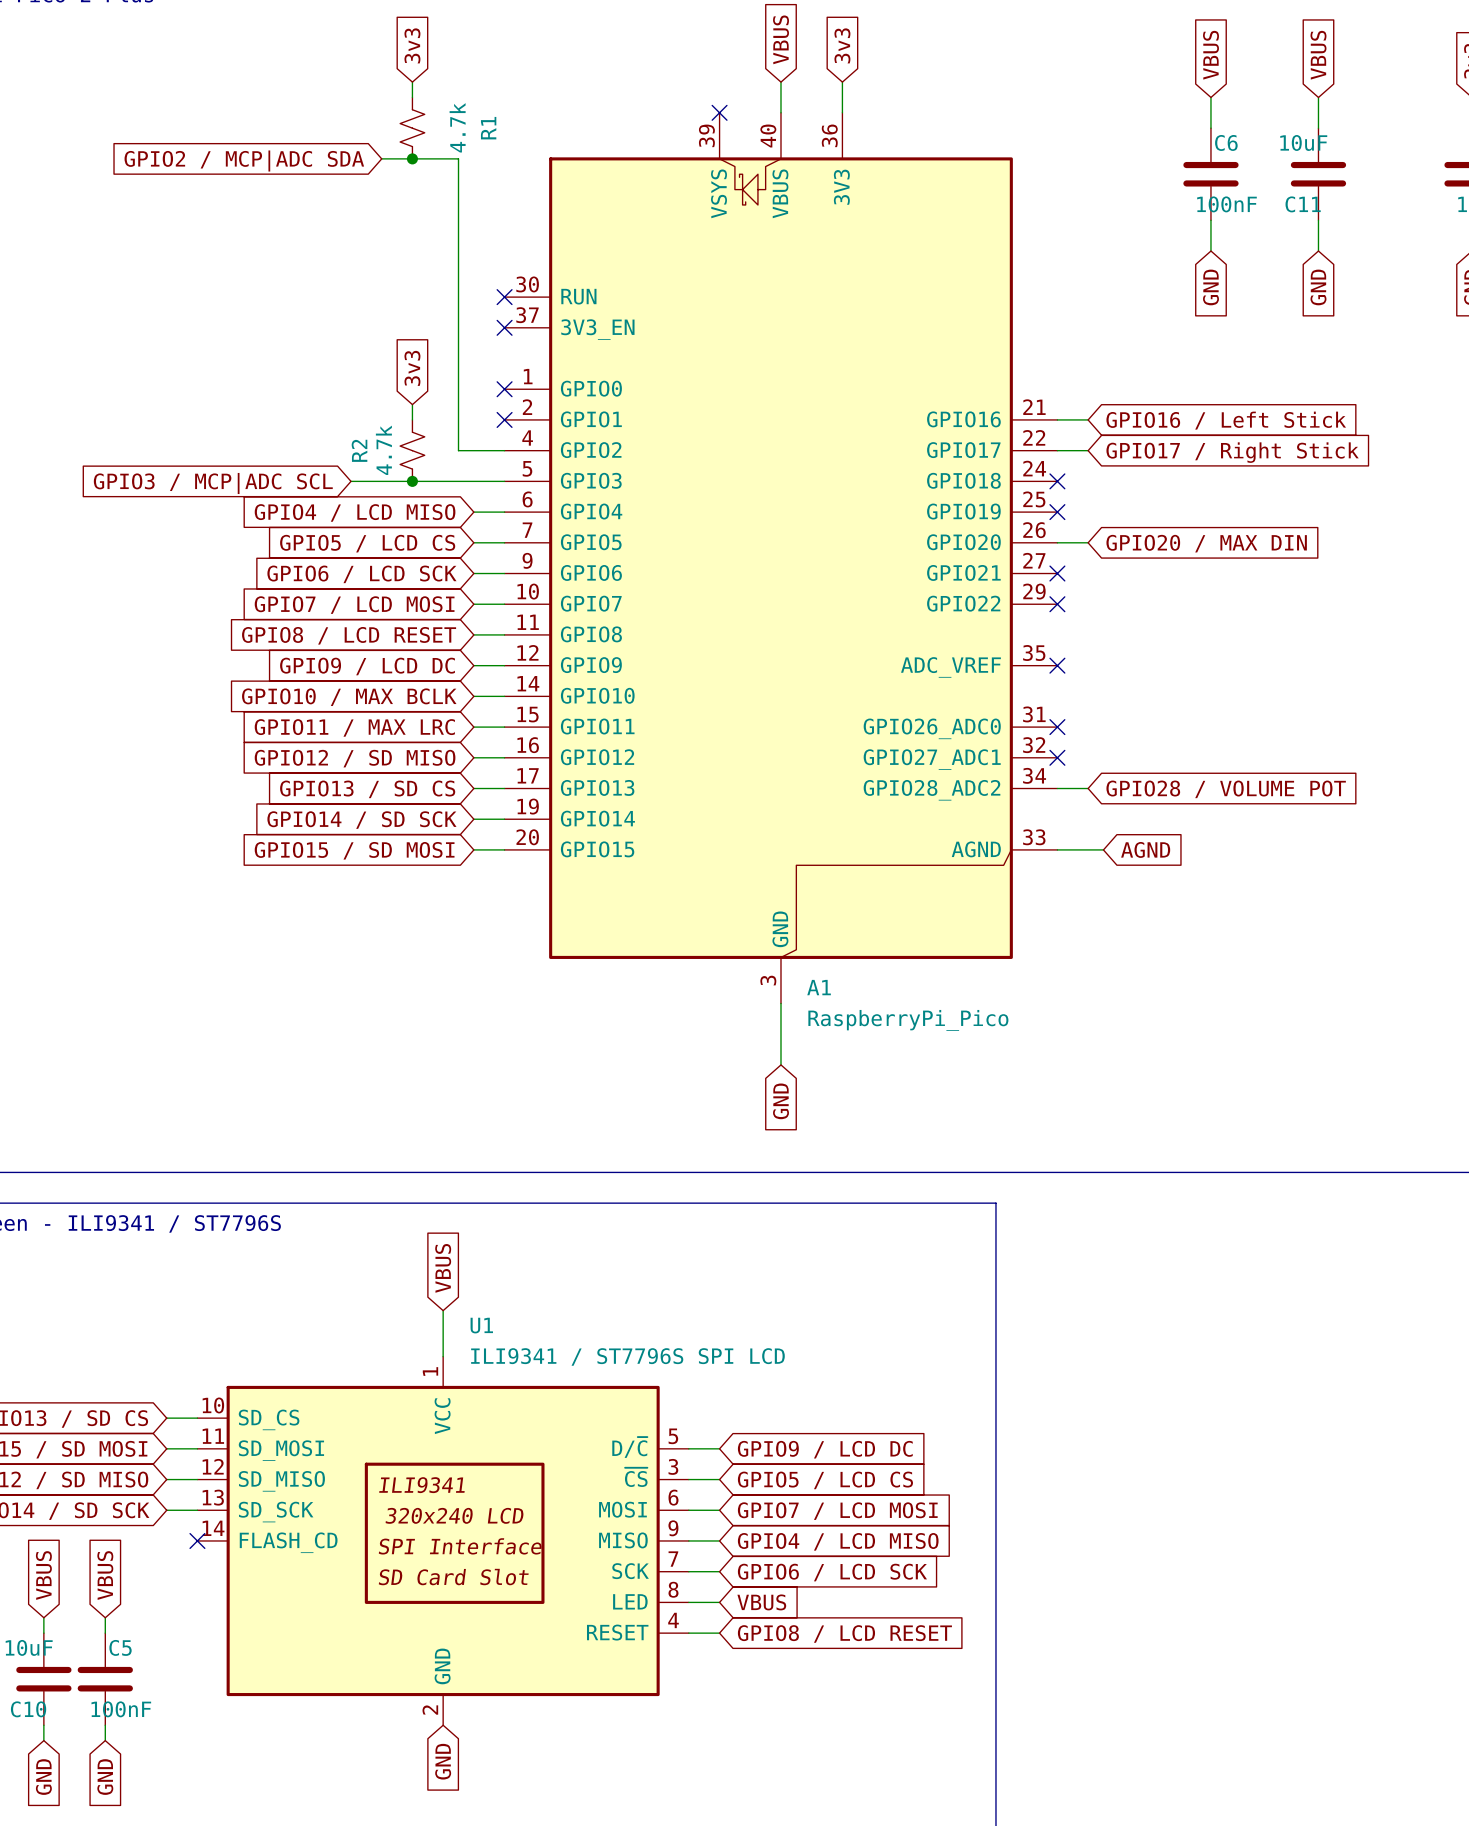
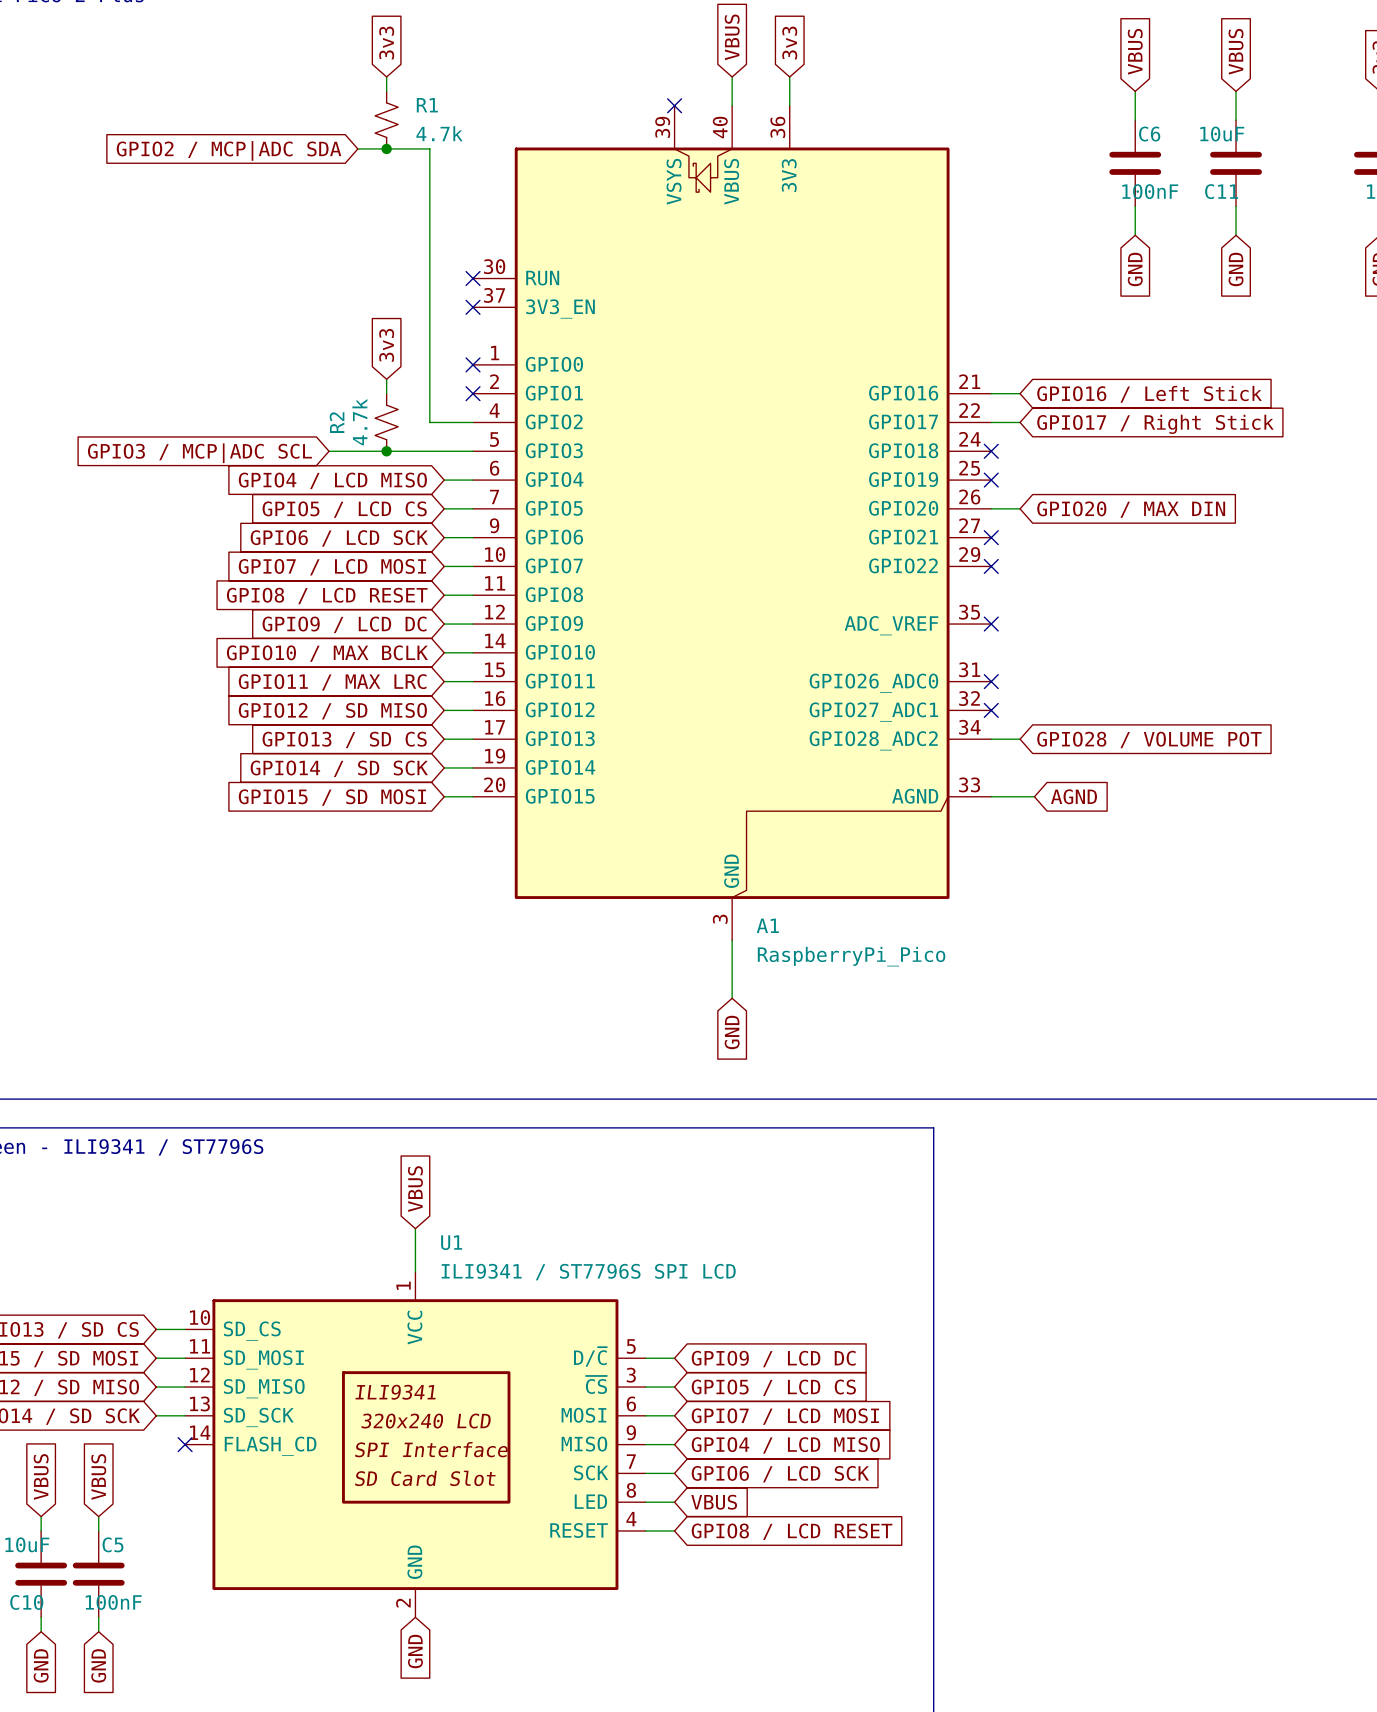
R1 value rotation: 0° (457, 127) -> 90° clockwise (439, 133)
R1 name rotation: 0° (488, 128) -> 90° clockwise (427, 105)

